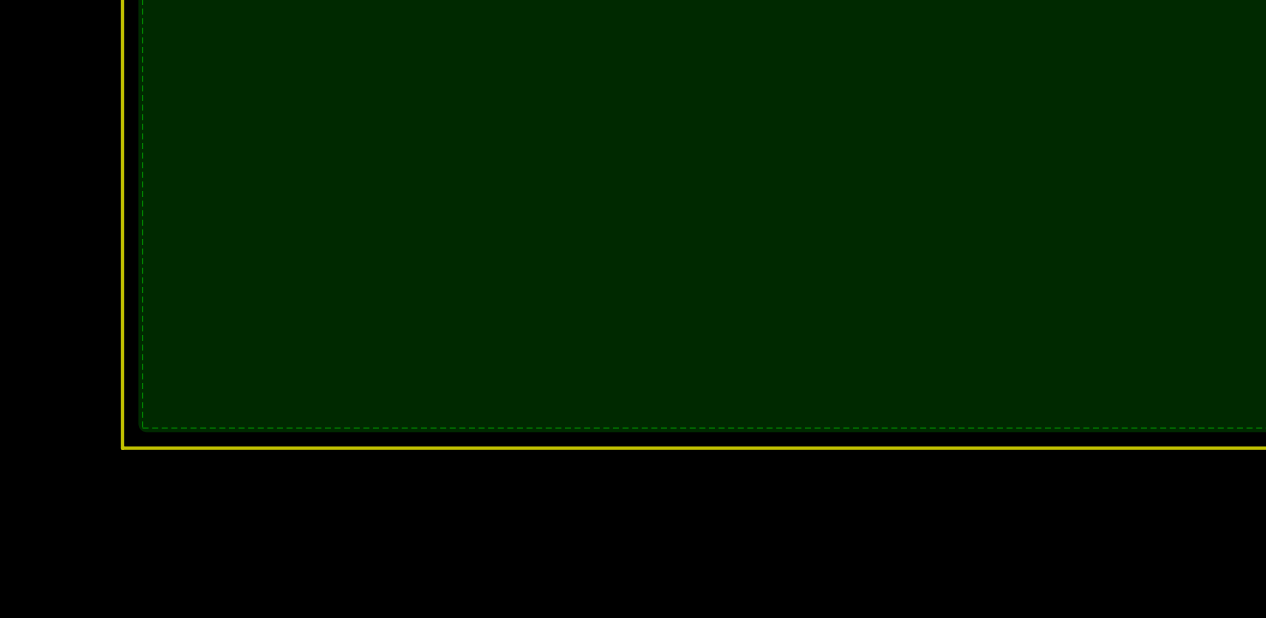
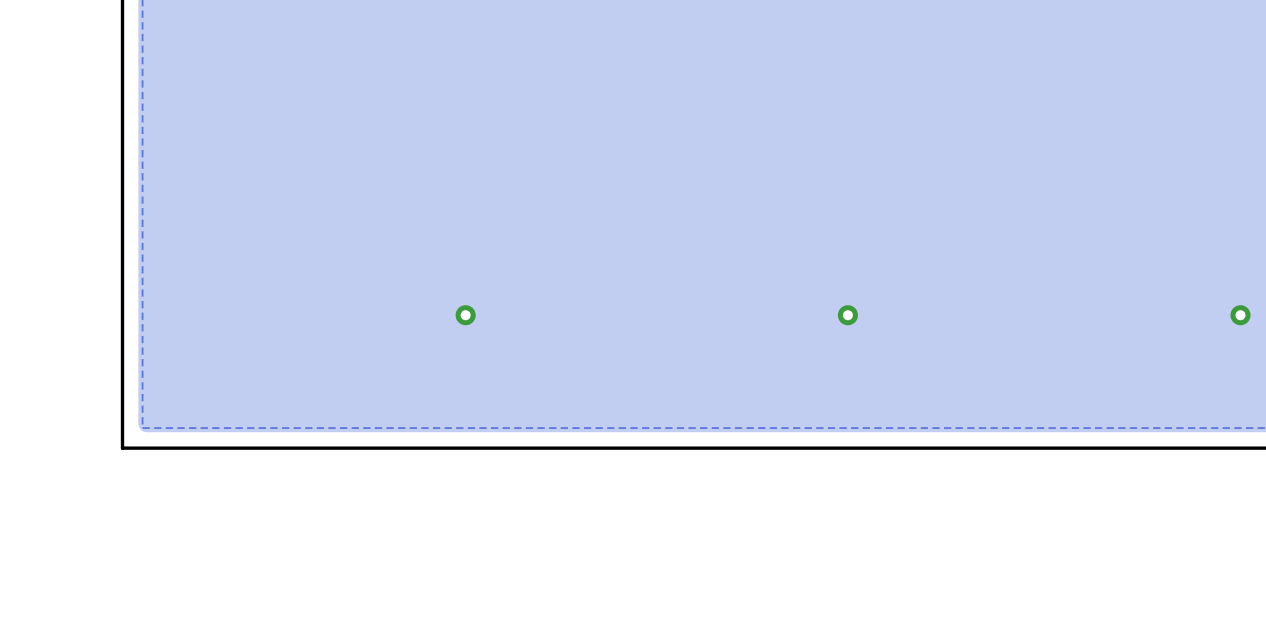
via: none -> (465, 315)
via: none -> (847, 315)
via: none -> (1240, 315)

